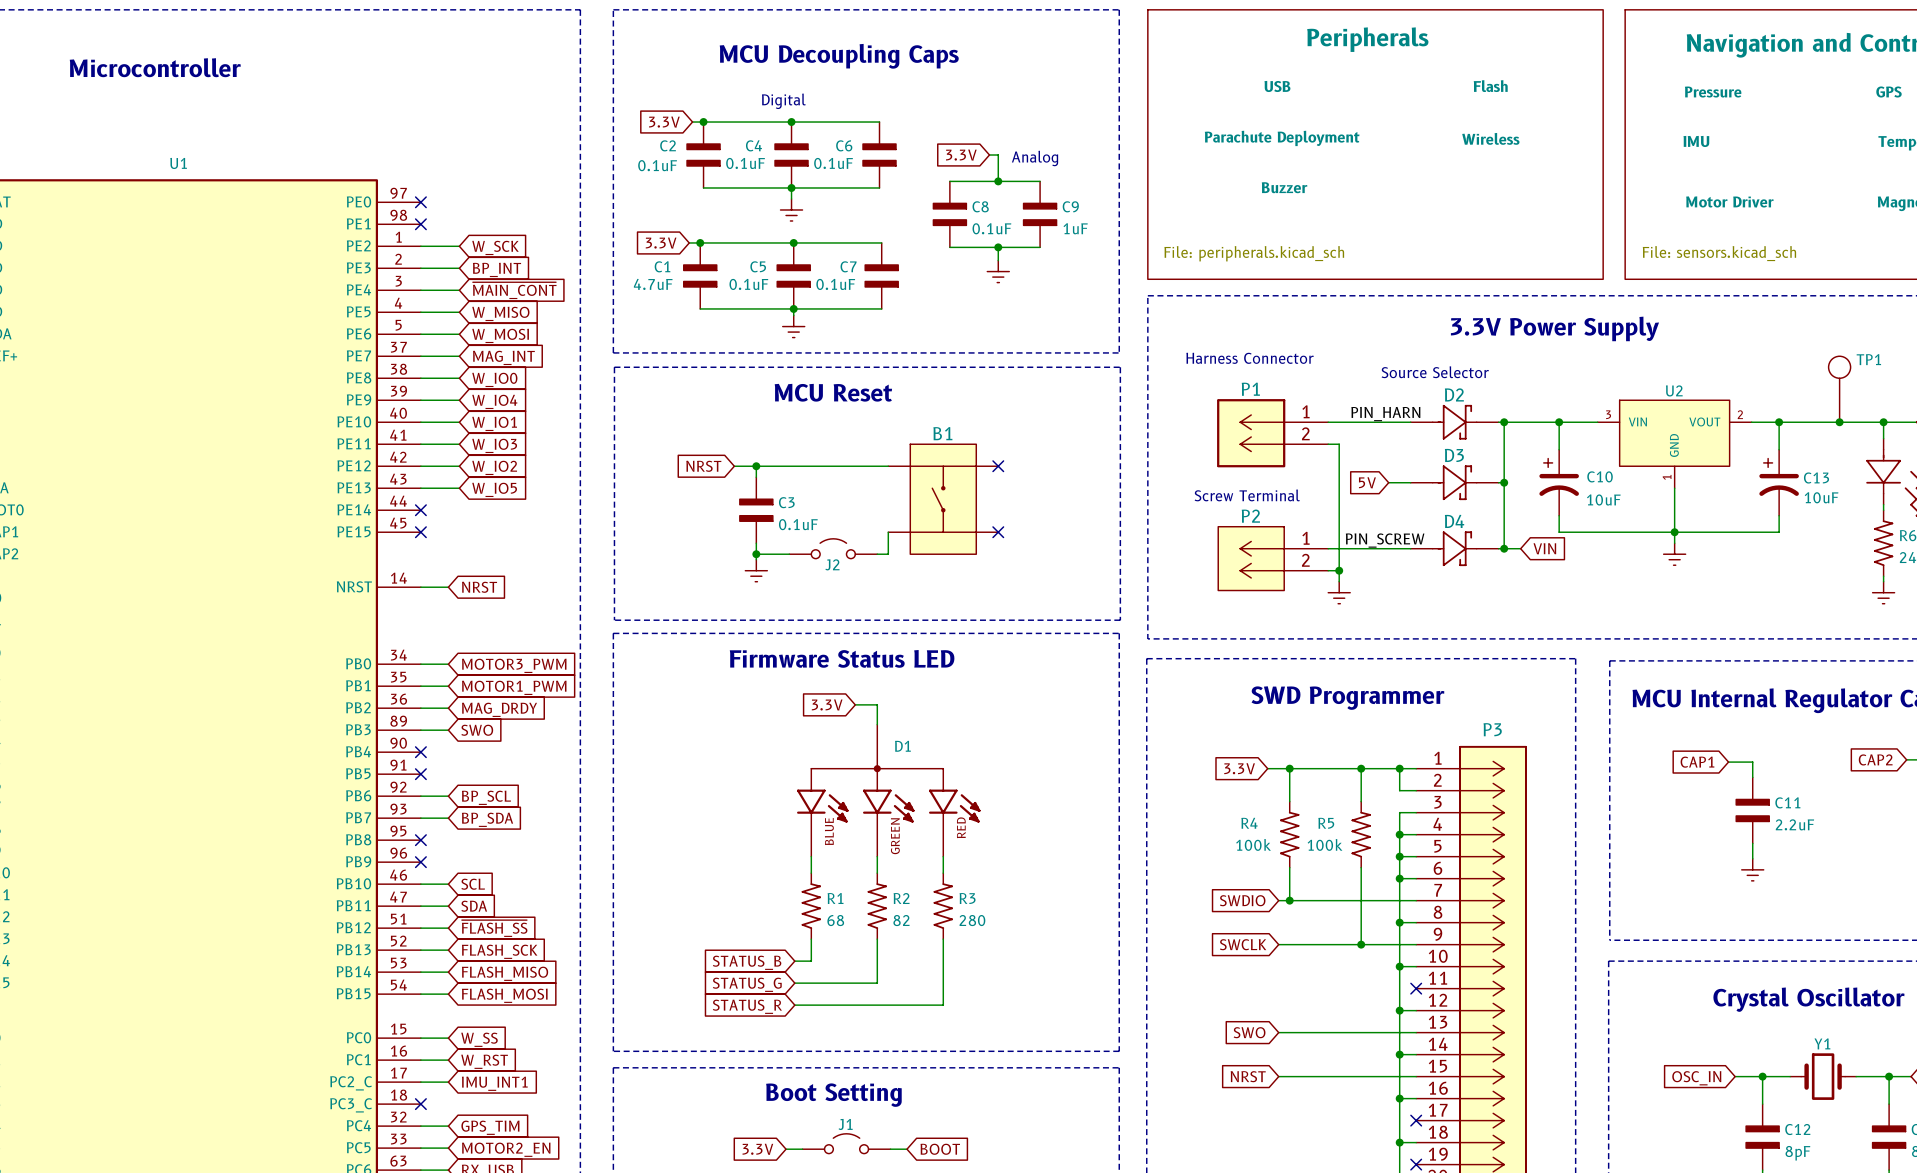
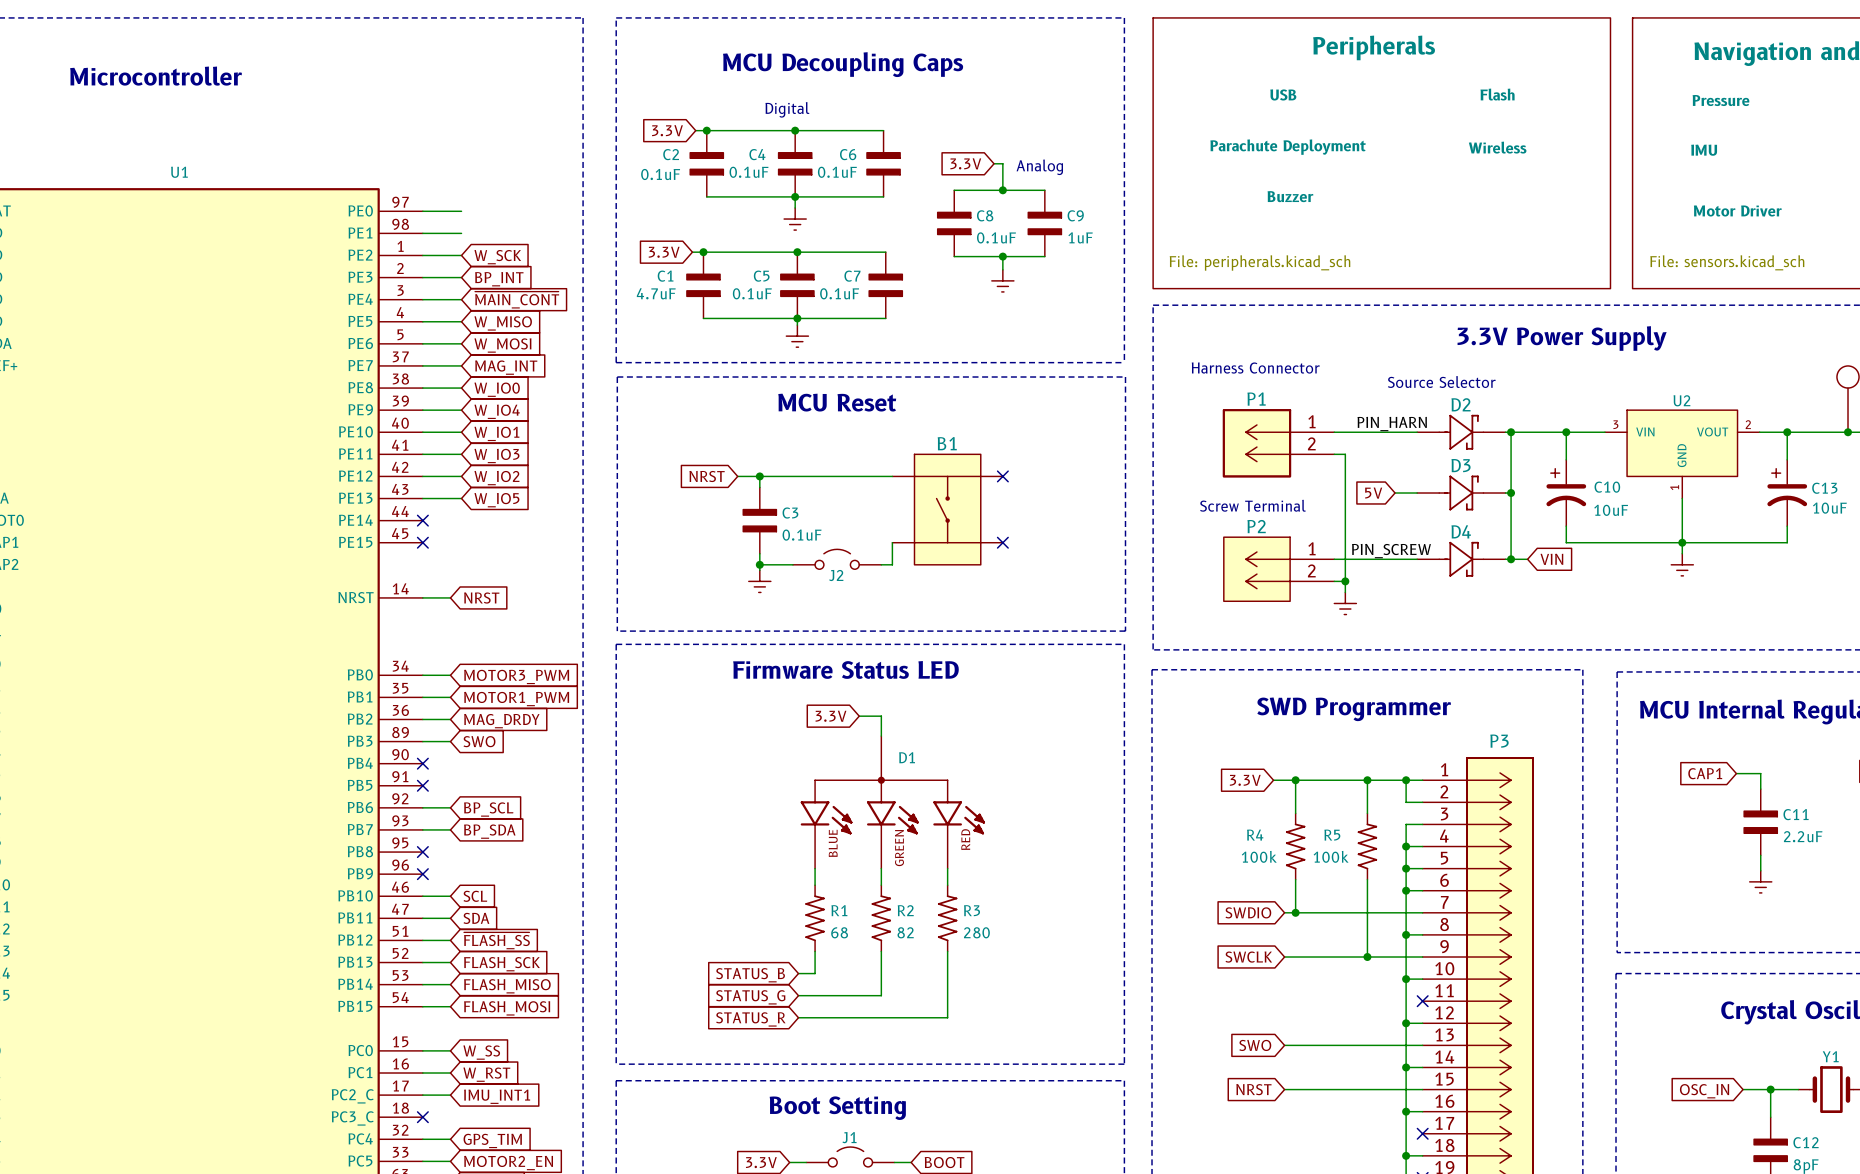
wire: none -> (422, 211) (461, 211)
no-connect mark: (420, 202) -> none
wire: none -> (422, 233) (461, 233)
no-connect mark: (420, 224) -> none

